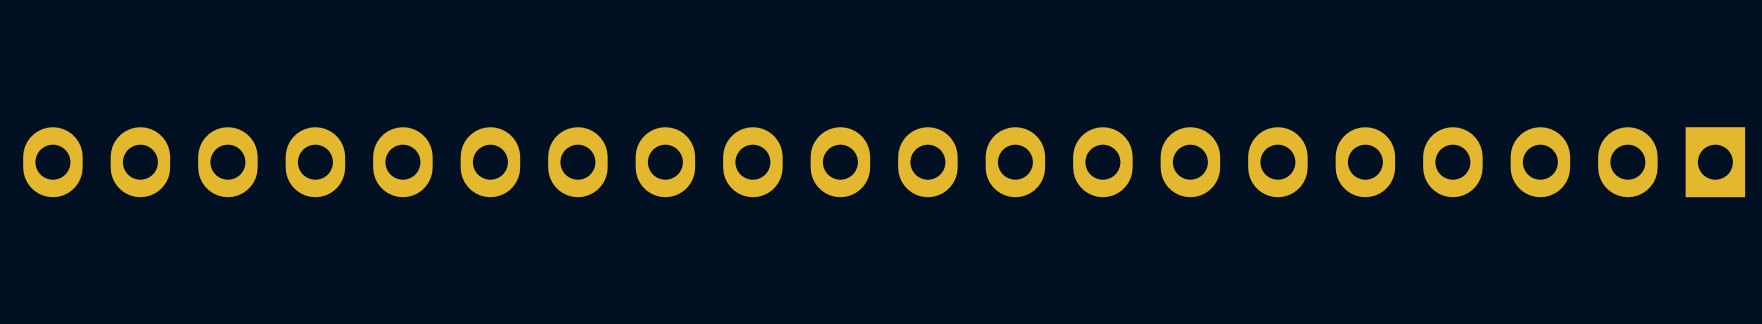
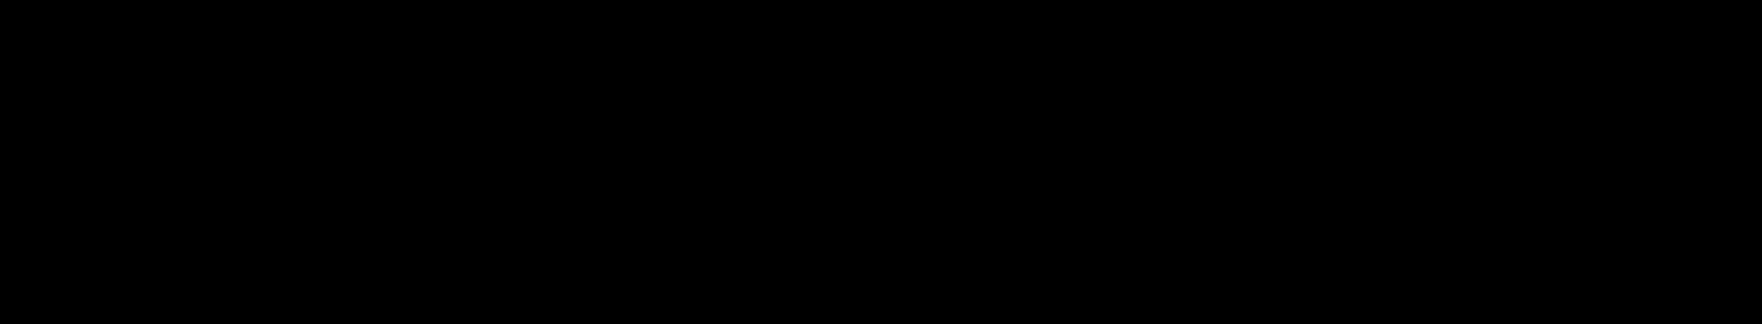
part: (884, 162) -> none

